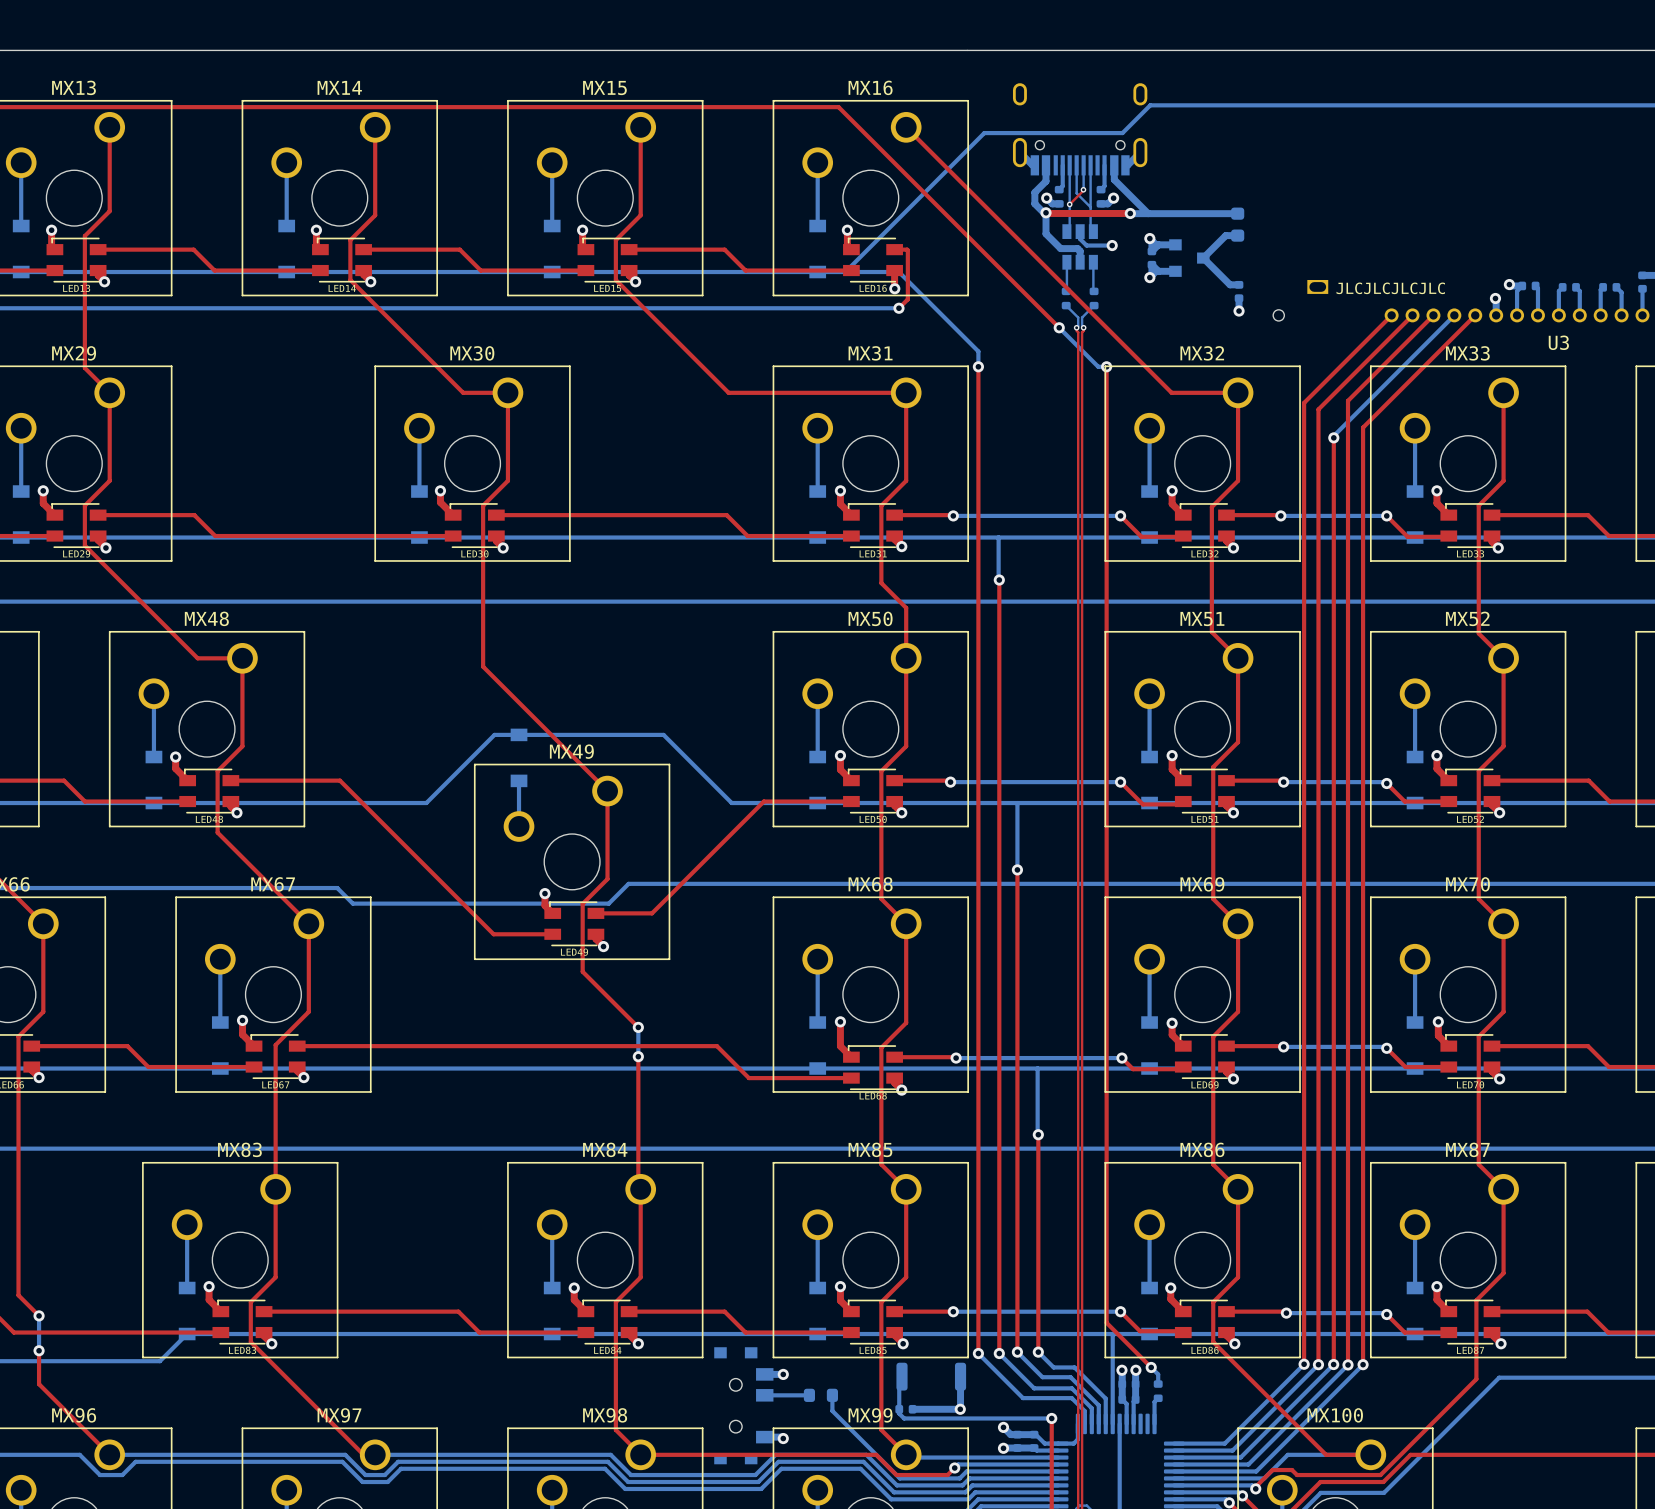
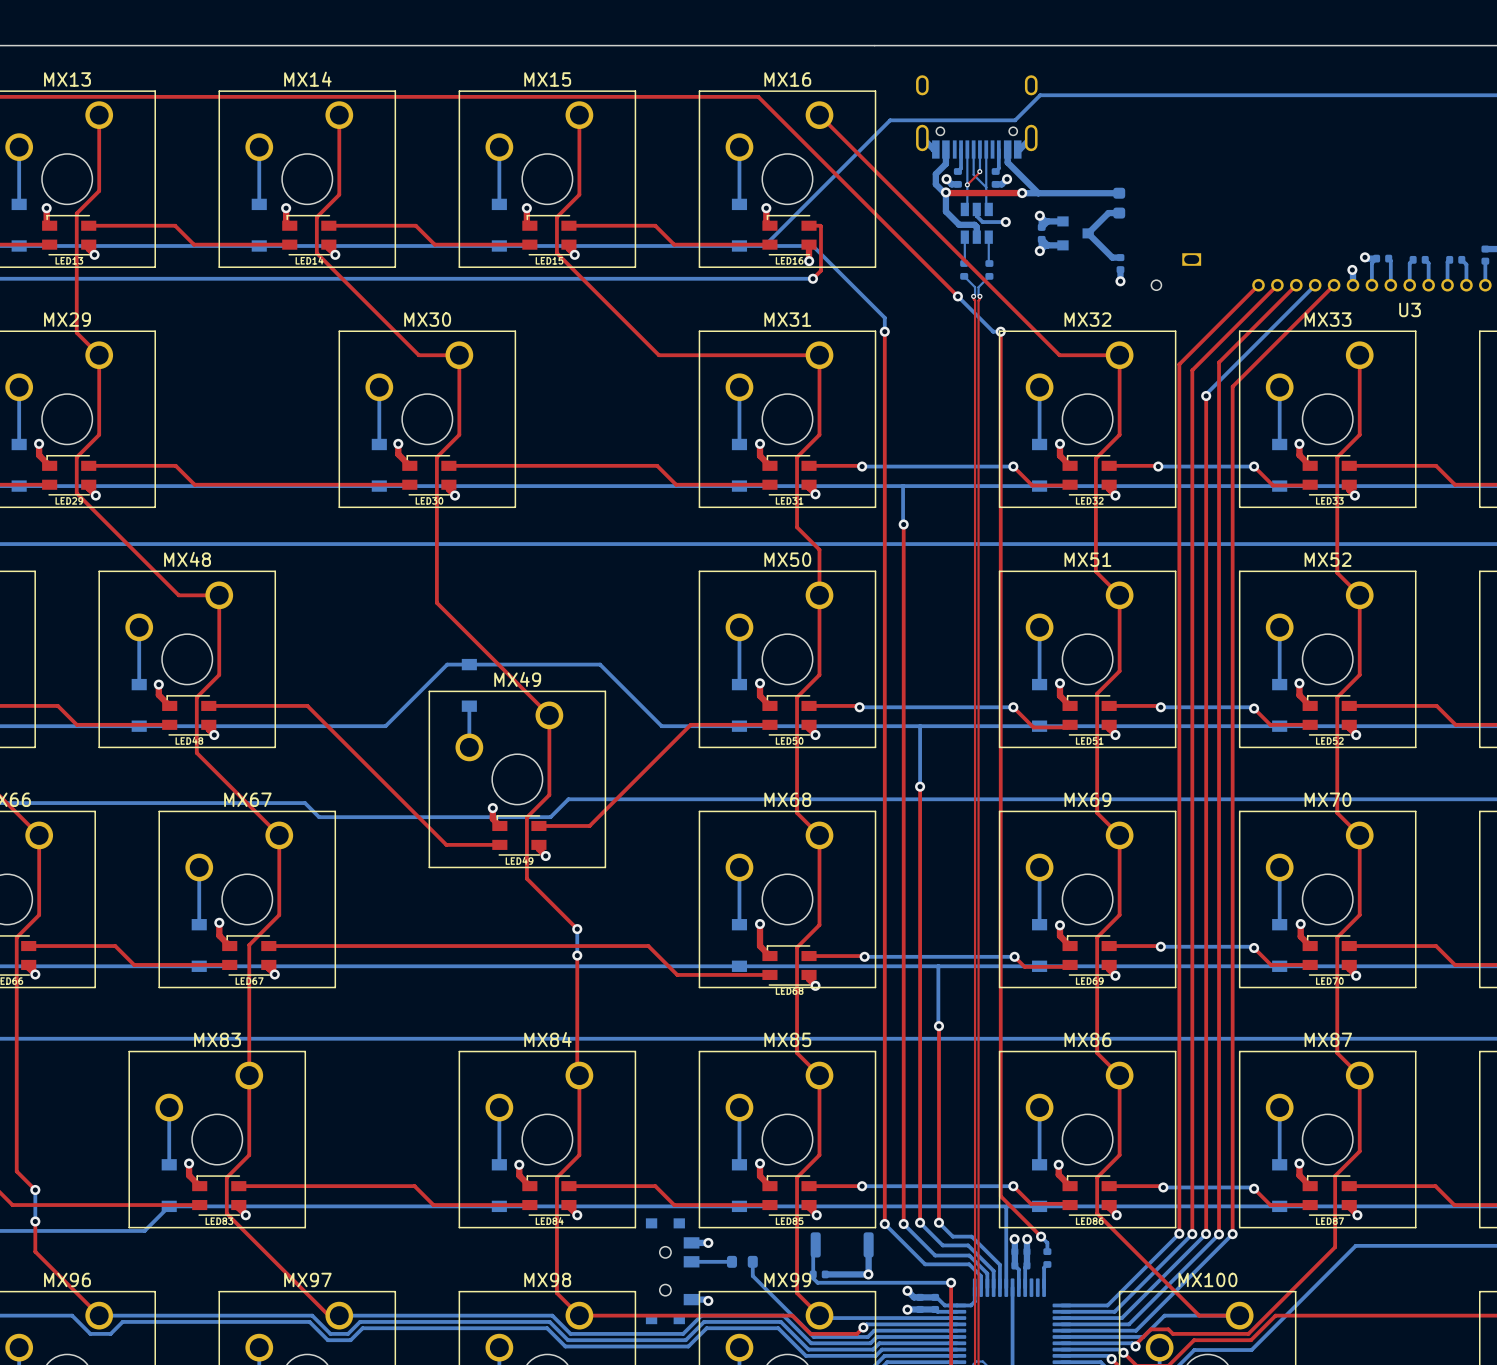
text: JLCJLCJLCJLC (1390, 288) -> none

